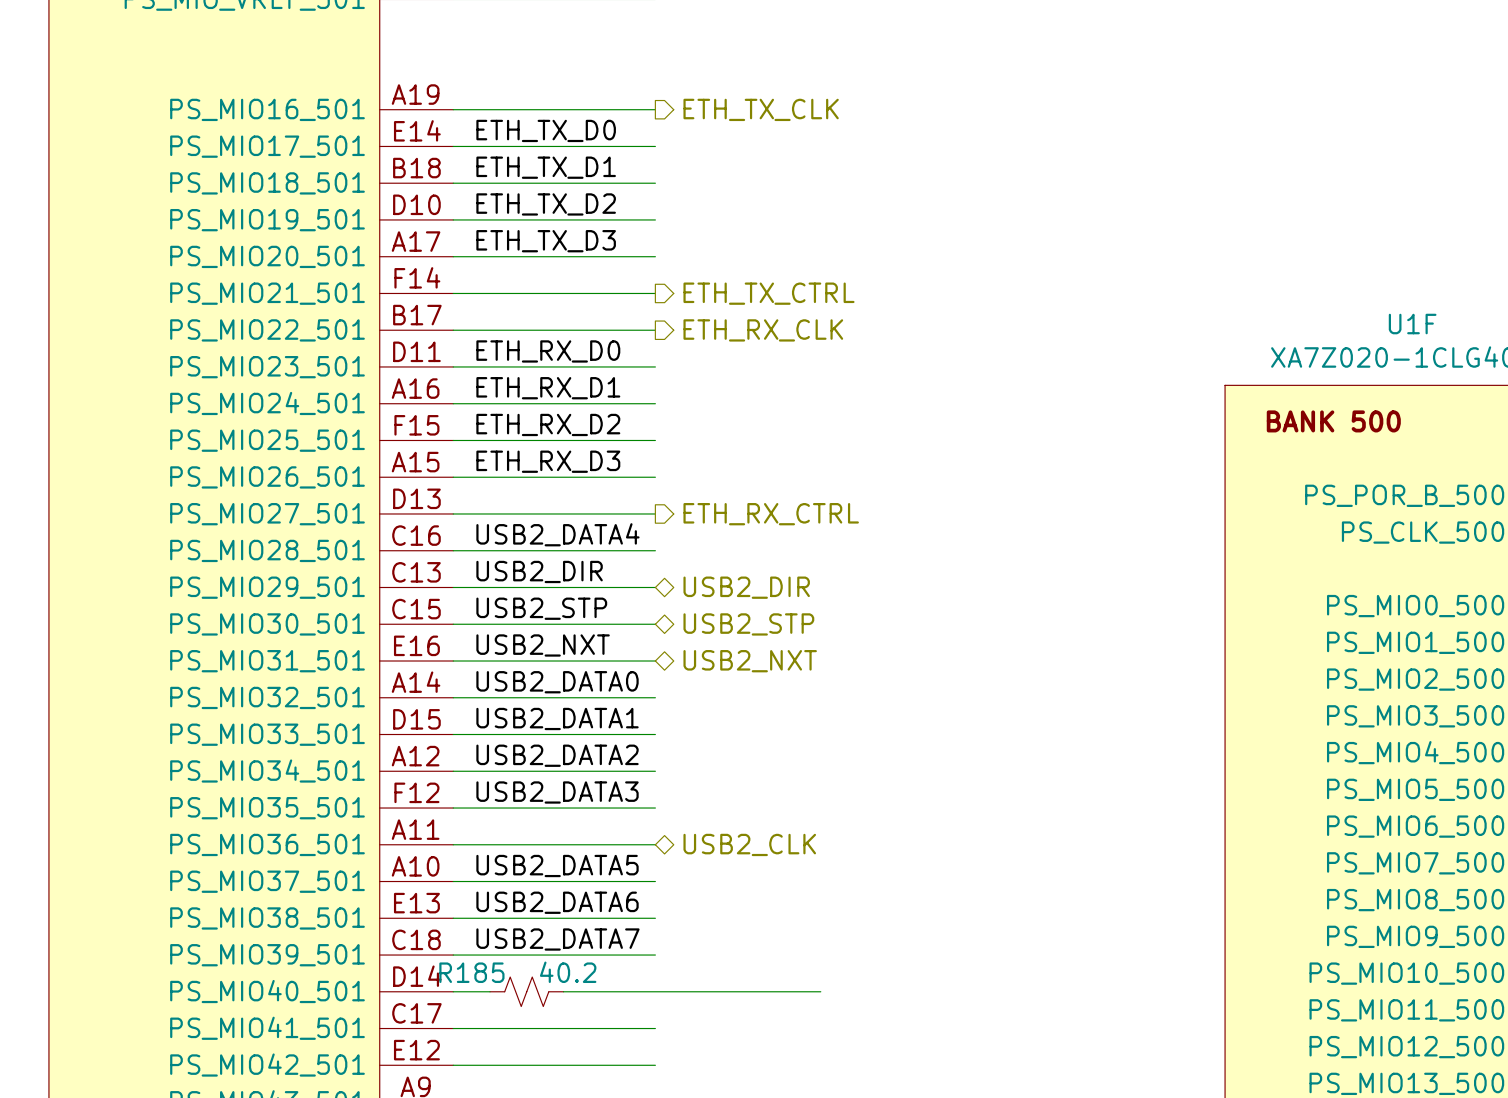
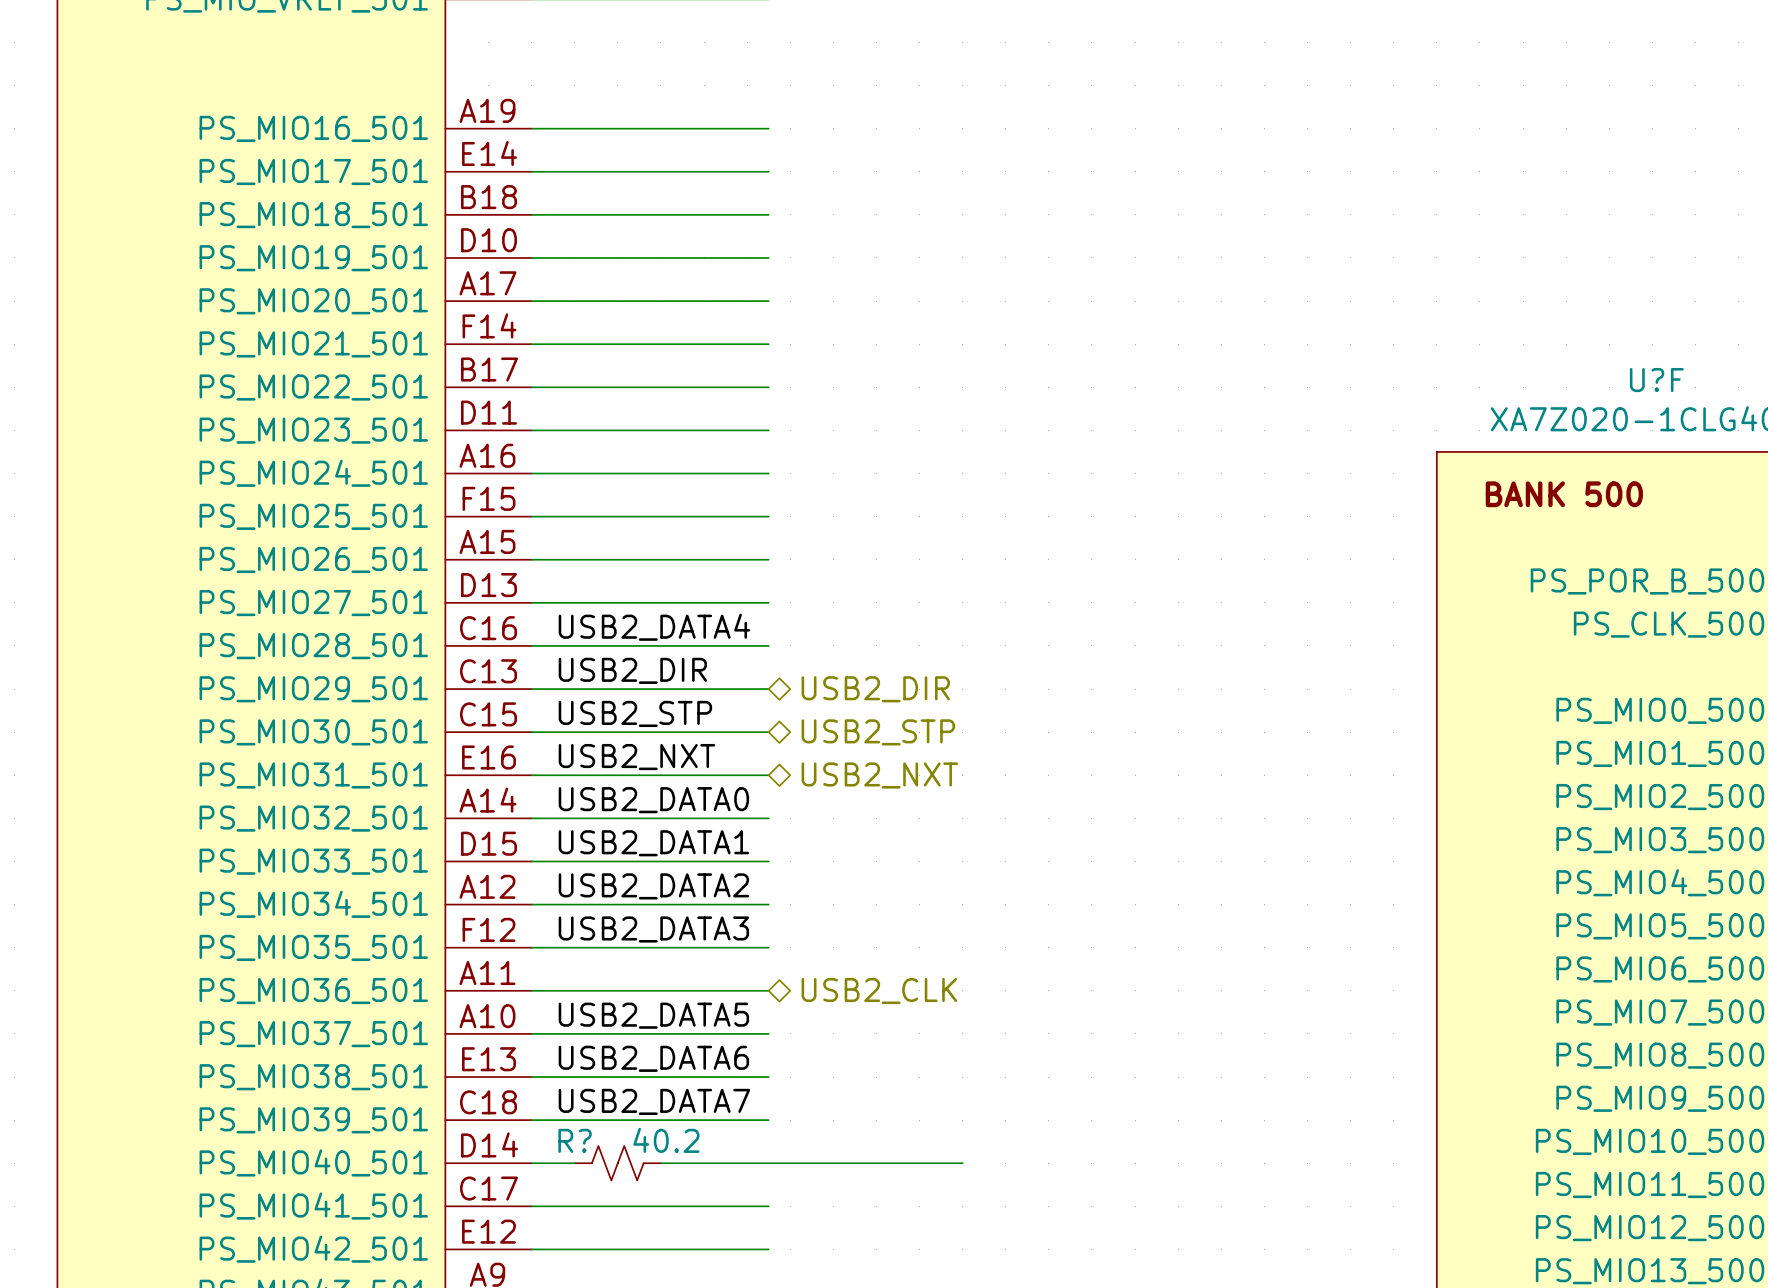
hierarchical label: ETH_TX_CLK (761, 109) -> none
label: ETH_TX_D0 (546, 130) -> none
label: ETH_TX_D1 (546, 167) -> none
label: ETH_TX_D2 (546, 204) -> none
label: ETH_TX_D3 (546, 241) -> none
hierarchical label: ETH_TX_CTRL (768, 293) -> none
U1F name: U1F (1412, 324) -> U?F (1656, 380)
hierarchical label: ETH_RX_CLK (763, 330) -> none
label: ETH_RX_D0 (548, 351) -> none
label: ETH_RX_D1 (548, 388) -> none
label: ETH_RX_D2 (548, 424) -> none
label: ETH_RX_D3 (548, 461) -> none
hierarchical label: ETH_RX_CTRL (771, 514) -> none
R185 name: R185 (471, 972) -> R? (575, 1140)

